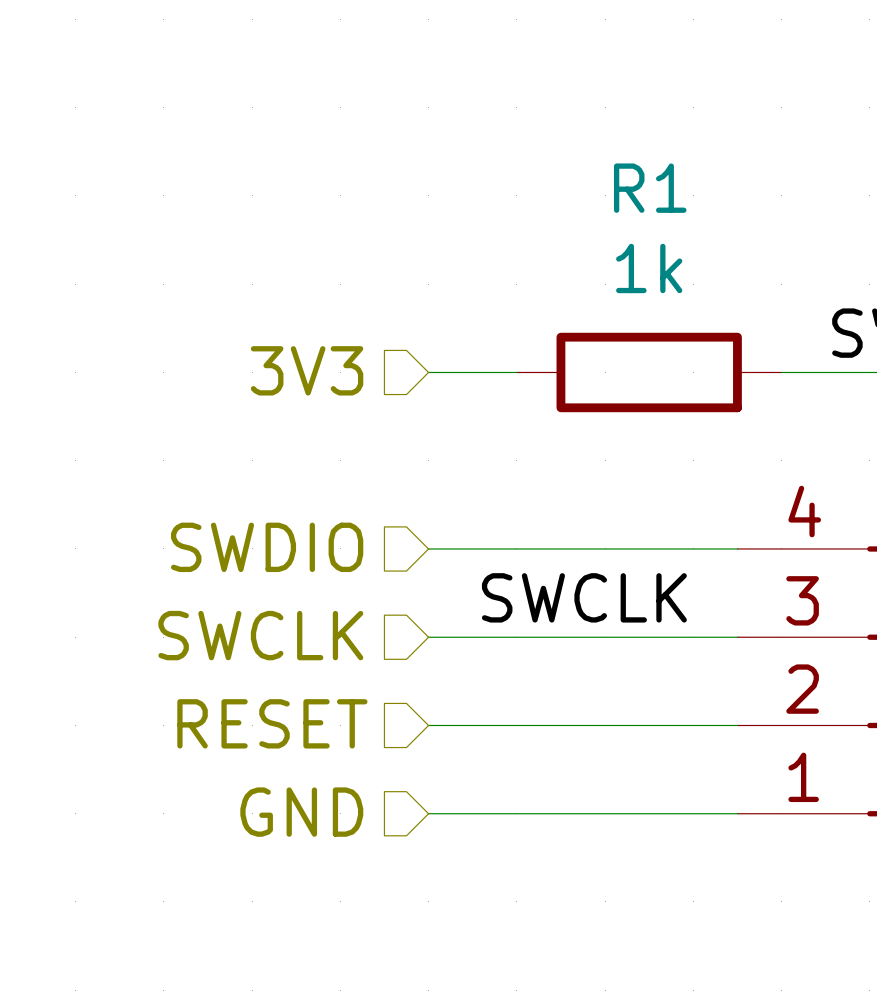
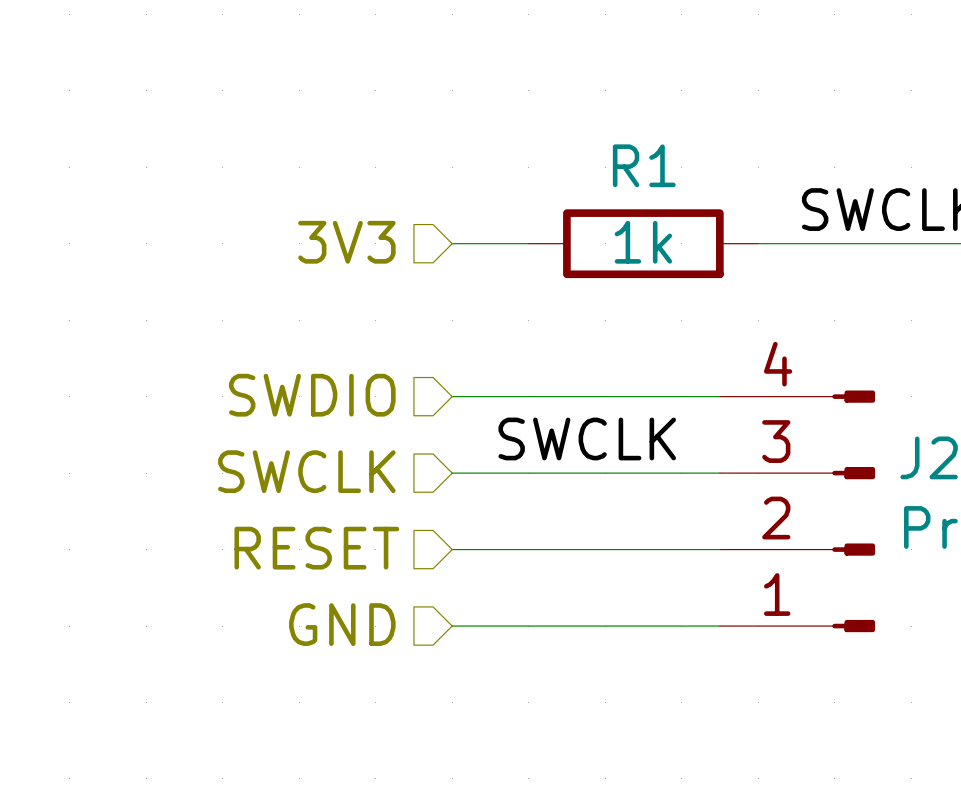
R1 name position: R1 (650, 188) -> R1 (644, 165)
R1 value position: 1k (649, 268) -> 1k (643, 242)

